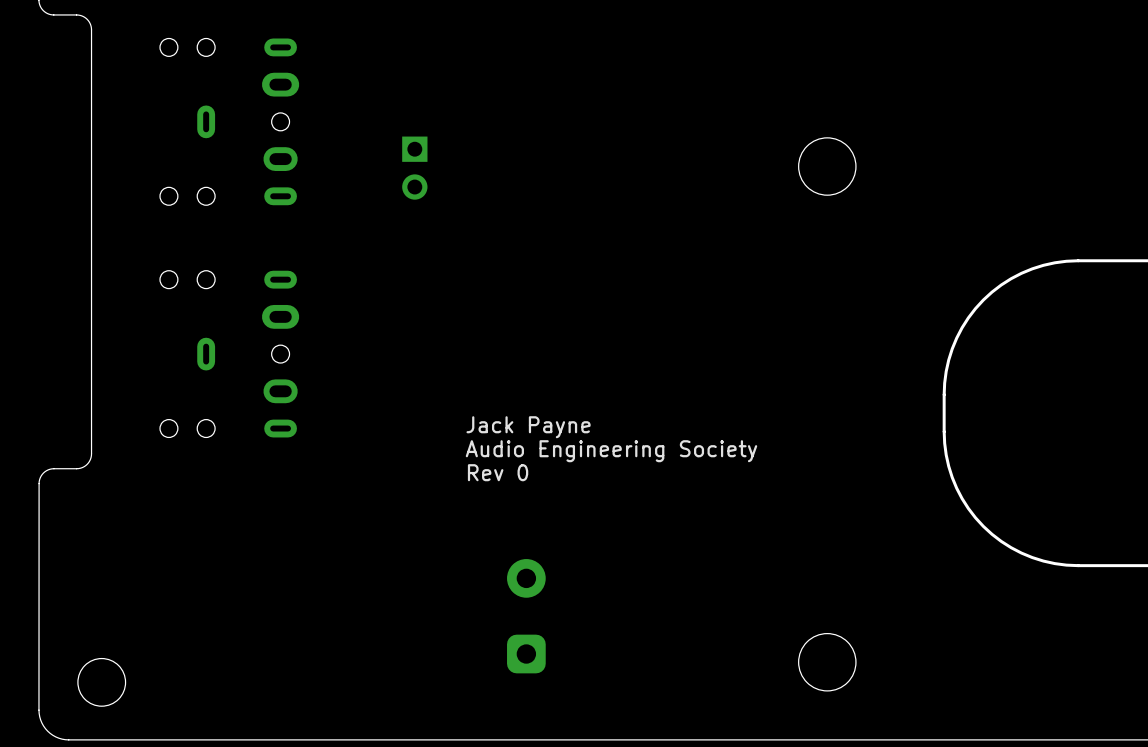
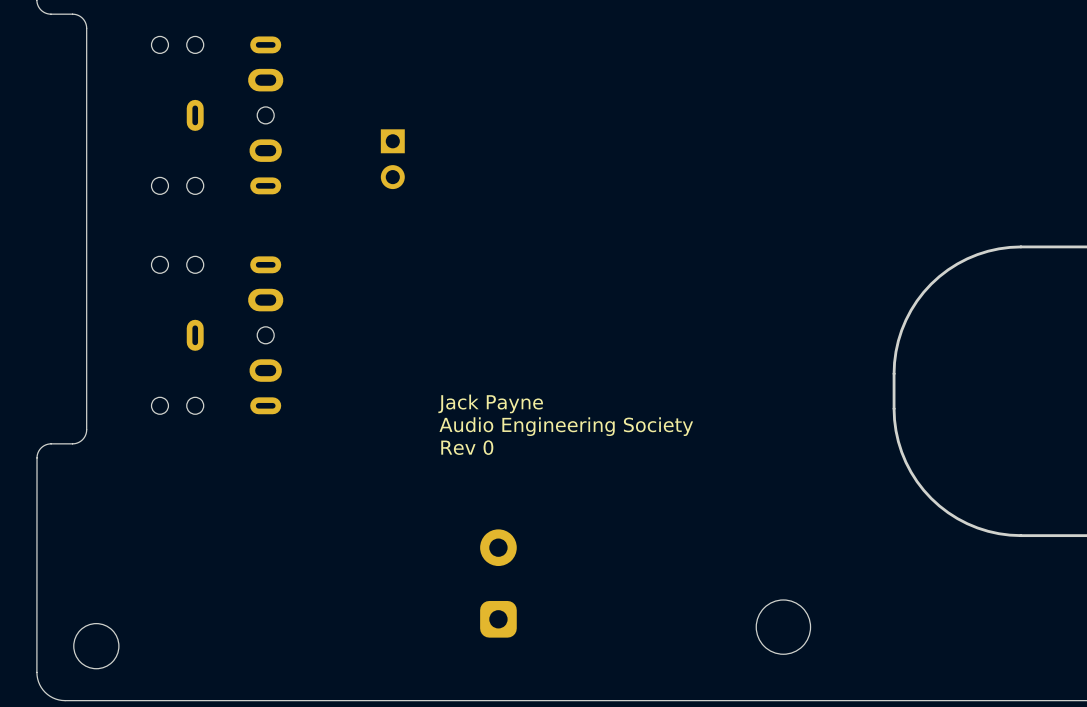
round board edge: [798, 137, 857, 196] -> none

